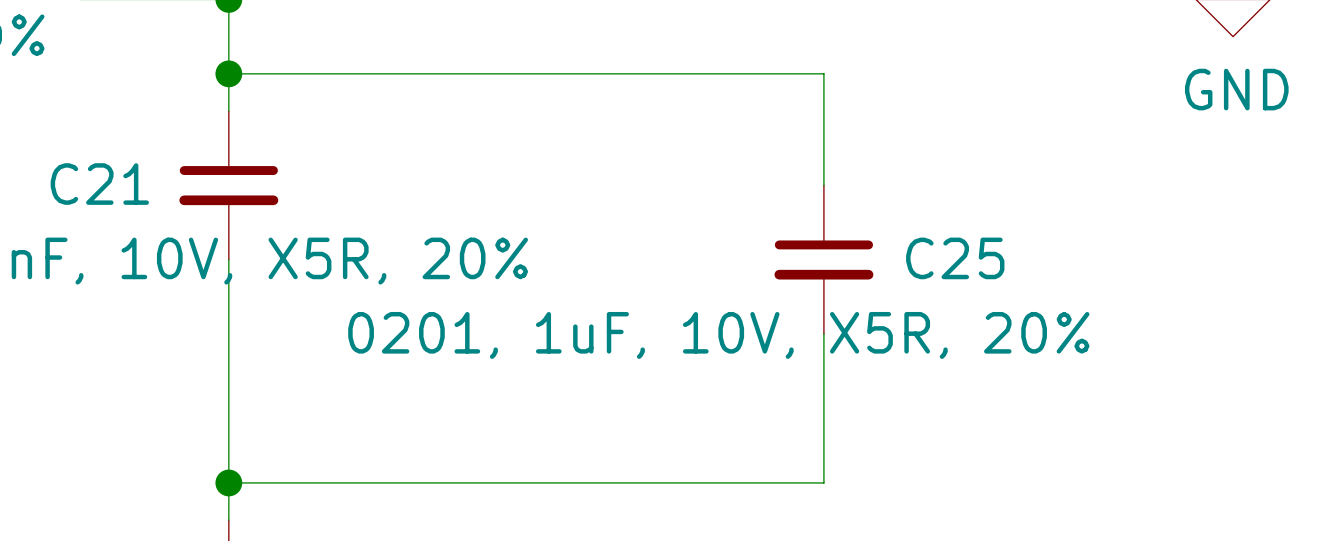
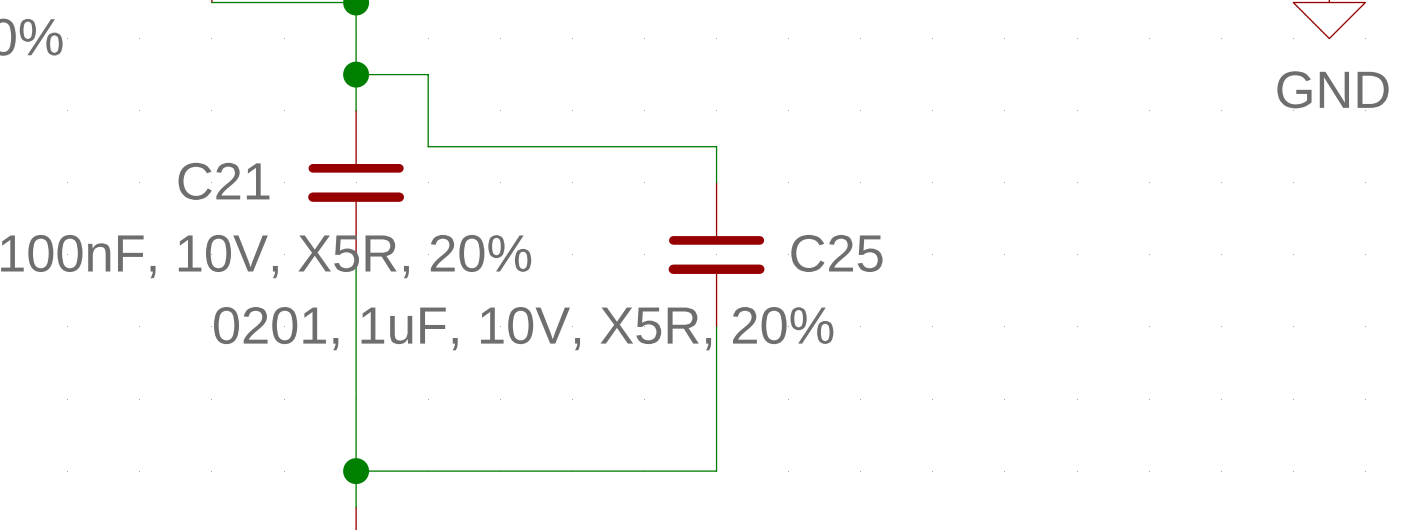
wire: (303, 73) (823, 73) (823, 185) -> (428, 74) (428, 146) (716, 146) (716, 182)
C25 position: (823, 259) -> (716, 254)
wire: (823, 334) (823, 482) (600, 482) -> (716, 326) (716, 471)
C25 value position: 0201, 1uF, 10V, X5R, 20% (718, 335) -> 0201, 1uF, 10V, X5R, 20% (523, 328)

